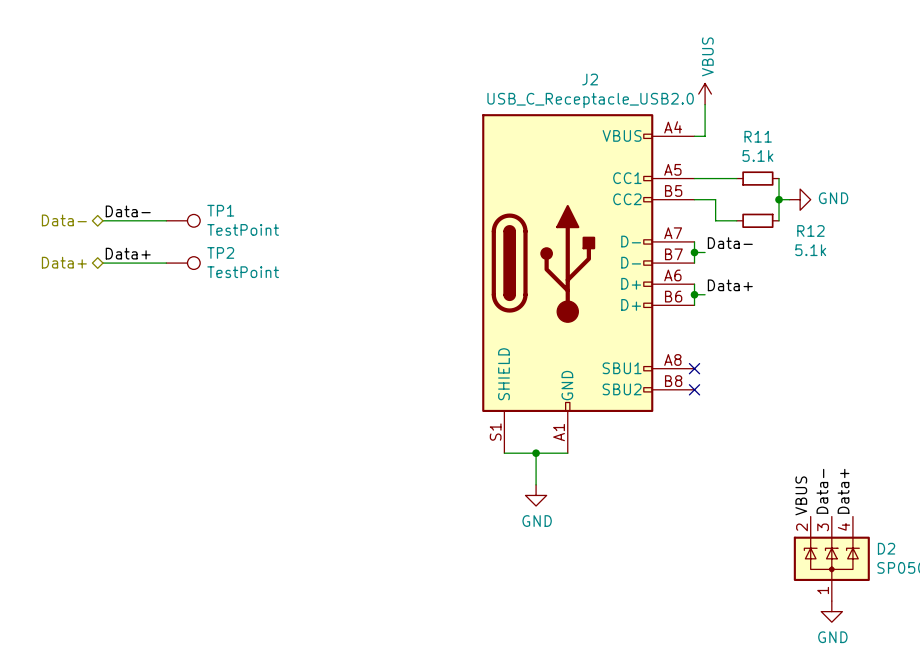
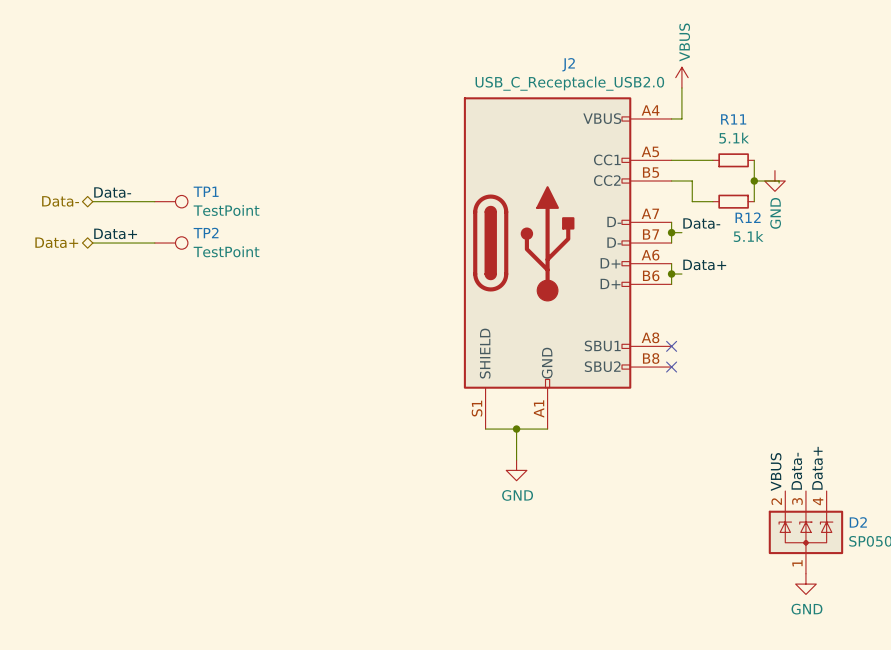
power symbol rotation: 0° (800, 199) -> 90° clockwise (774, 181)
R12 name position: R12 (810, 230) -> R12 (748, 217)
R12 value position: 5.1k (810, 250) -> 5.1k (748, 236)

